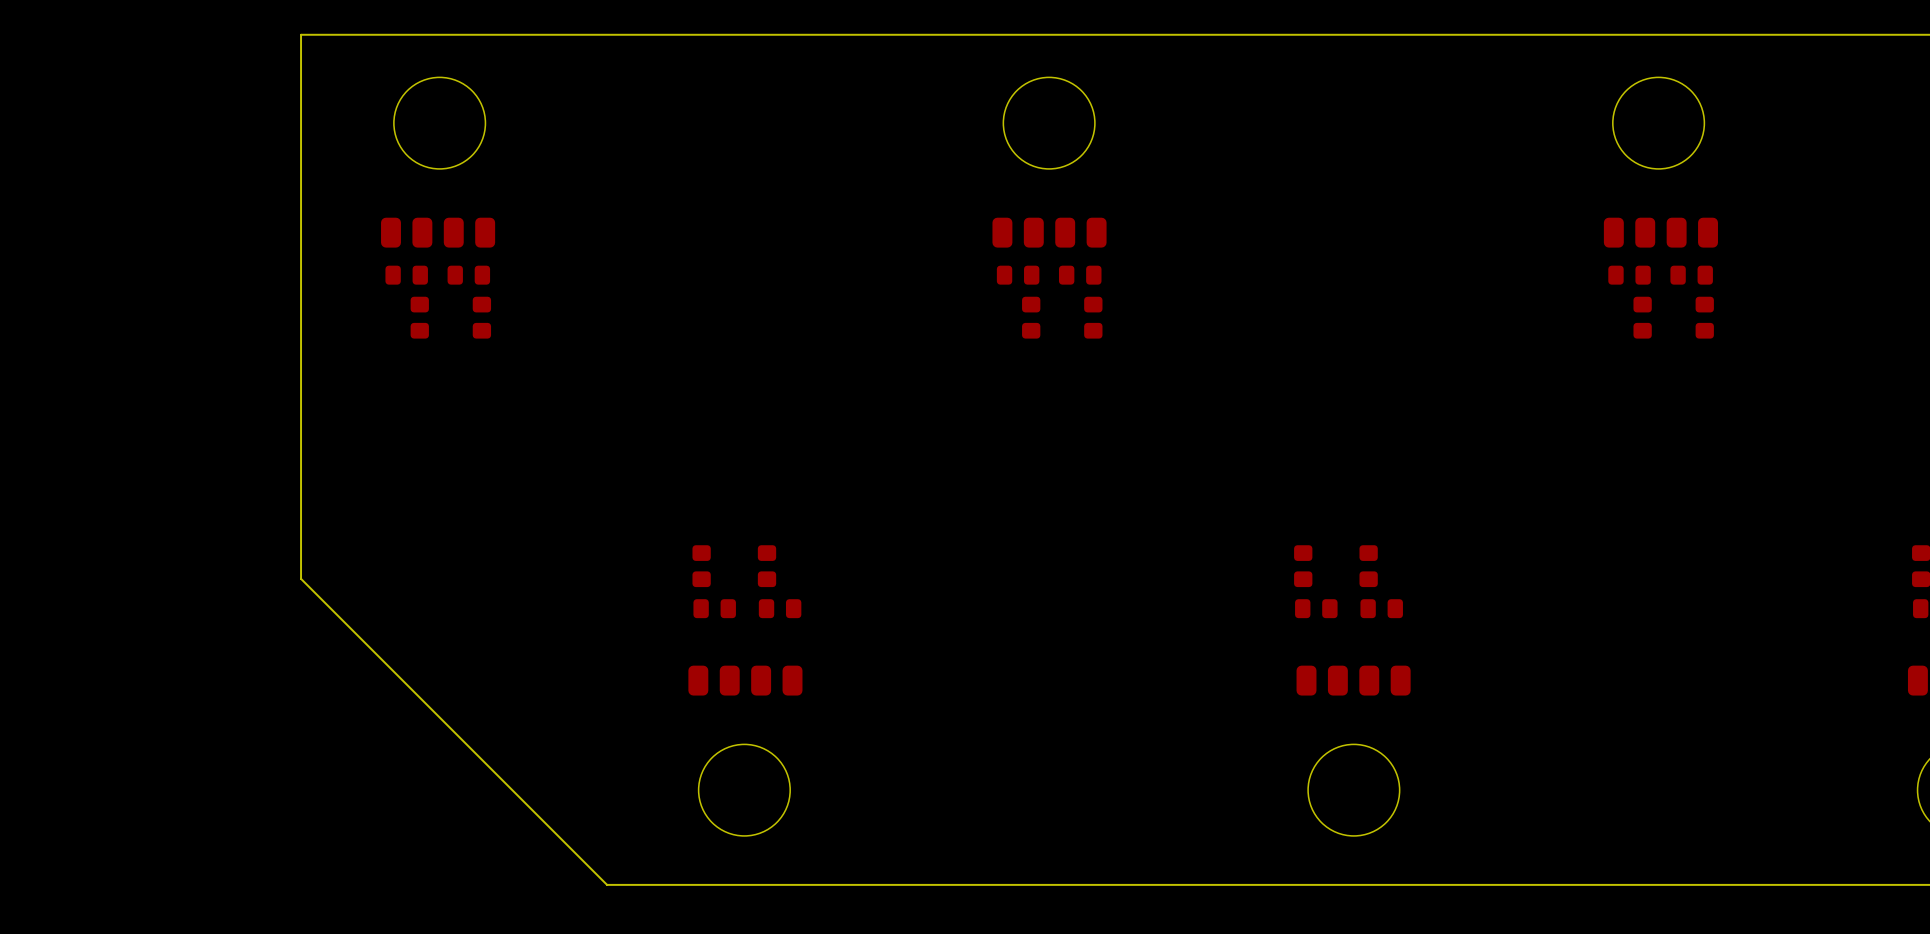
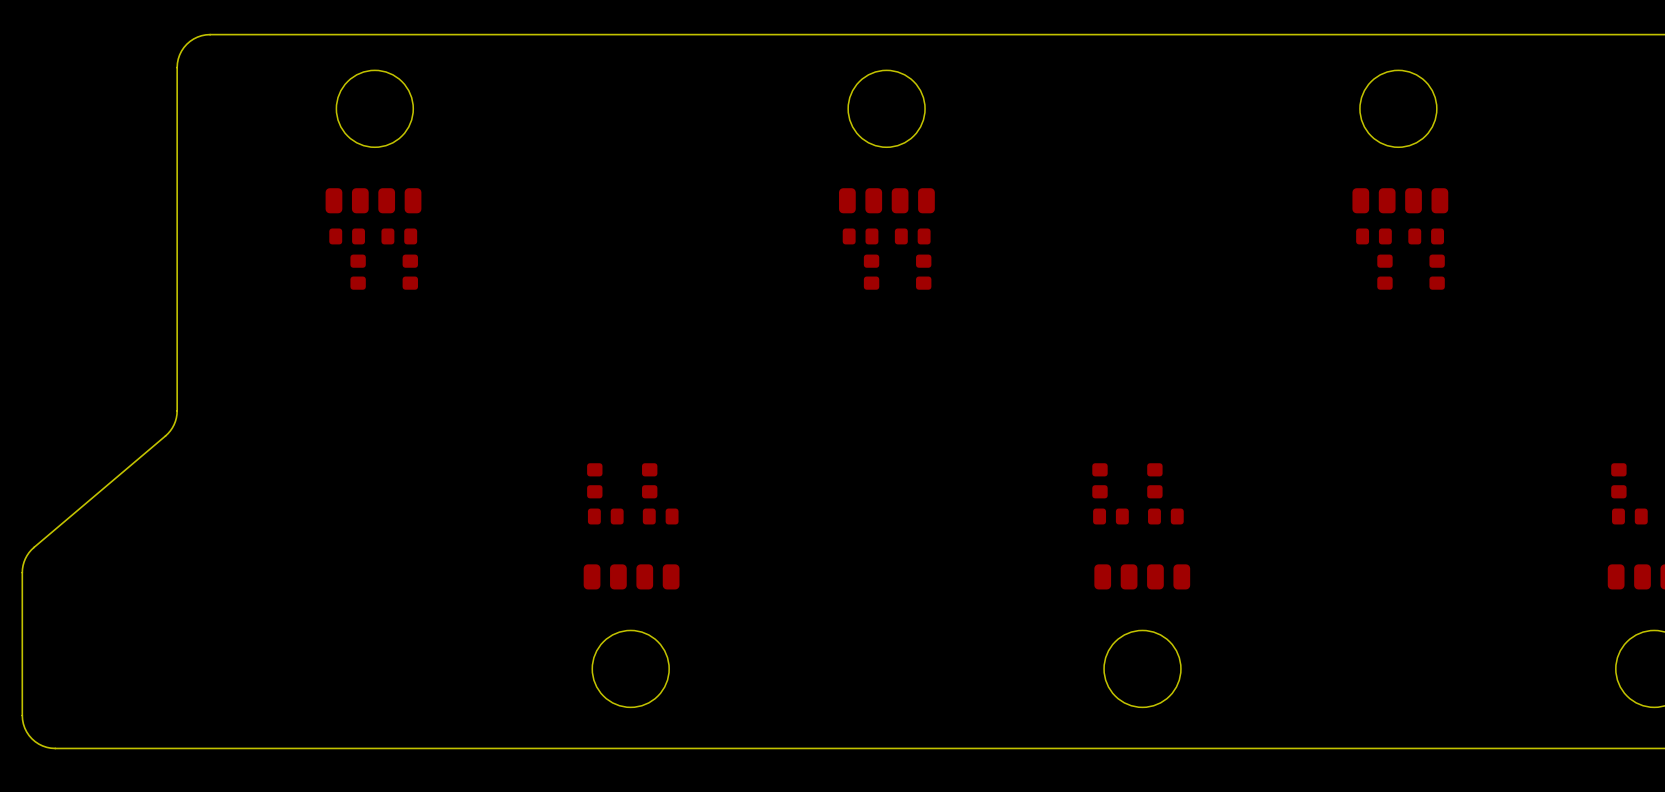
board edge: (301, 34) (301, 578) (607, 884) -> (258, 34) (201, 35) (186, 44) (178, 59) (176, 417) (172, 427) (165, 436) (33, 547) (25, 558) (22, 572) (22, 715) (24, 728) (35, 741) (42, 745) (55, 748) (515, 748)

